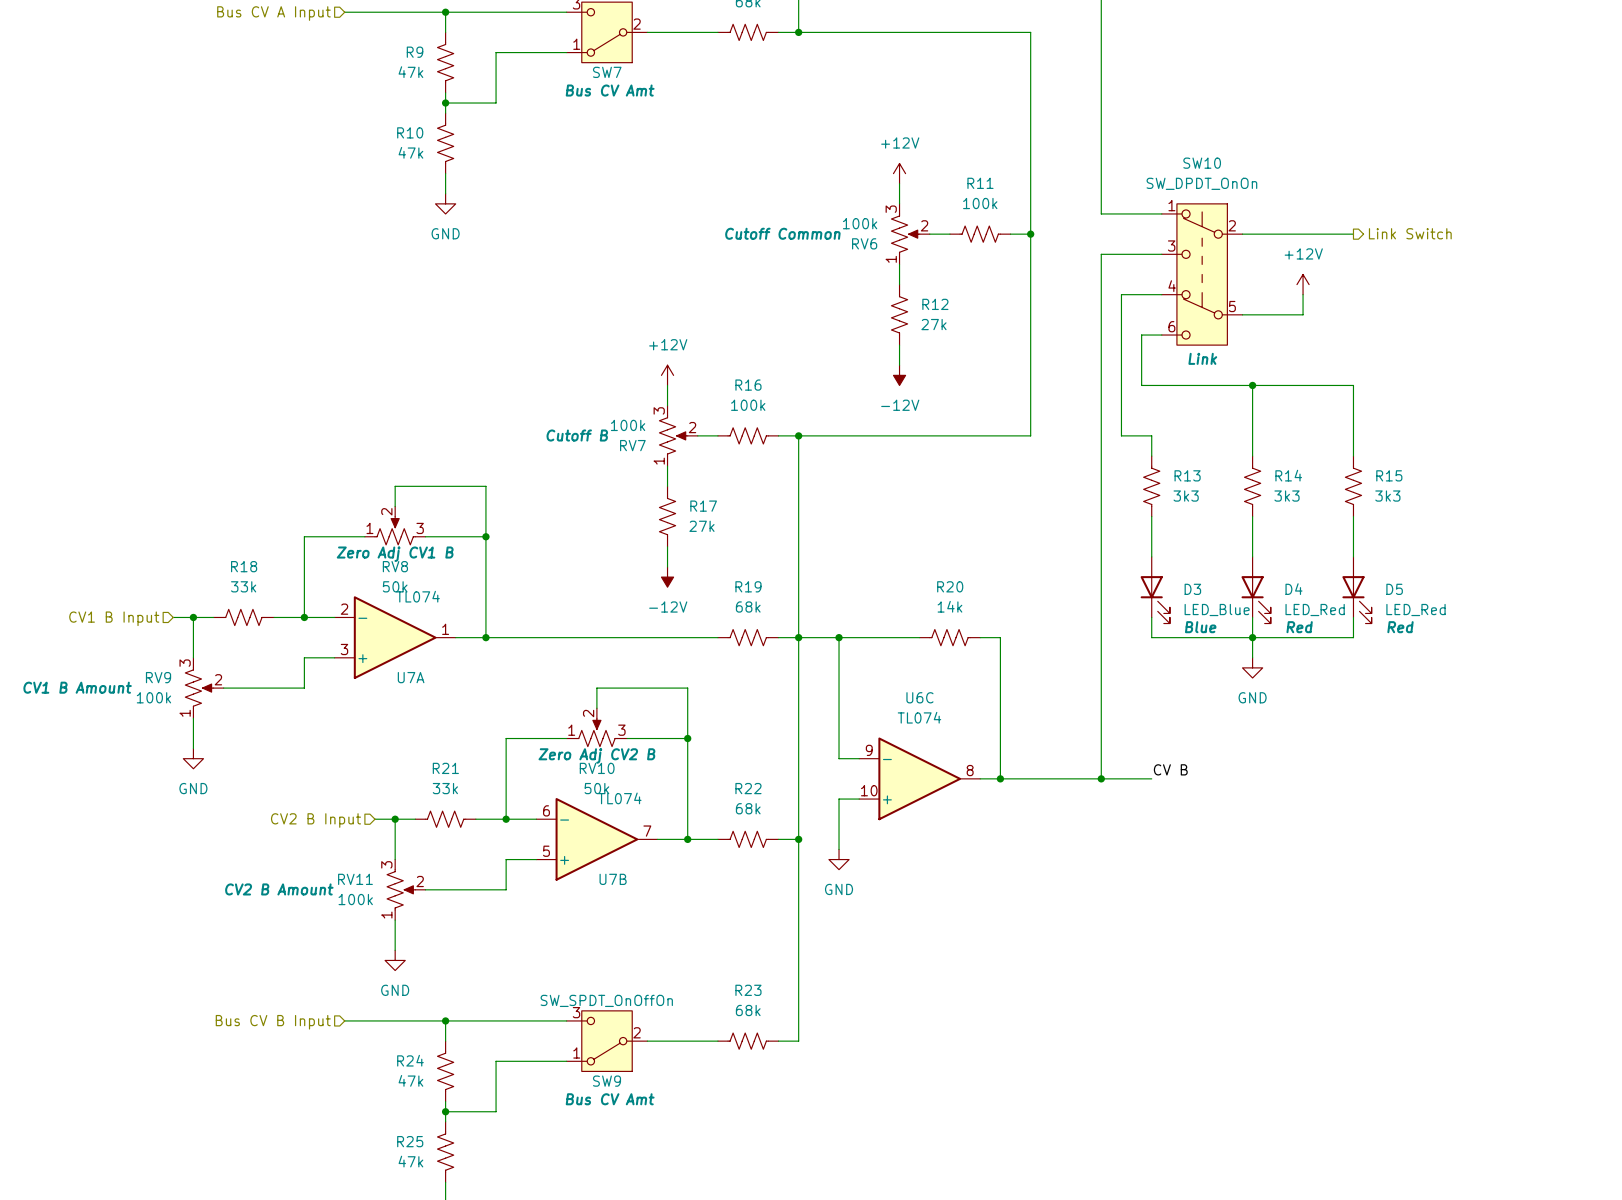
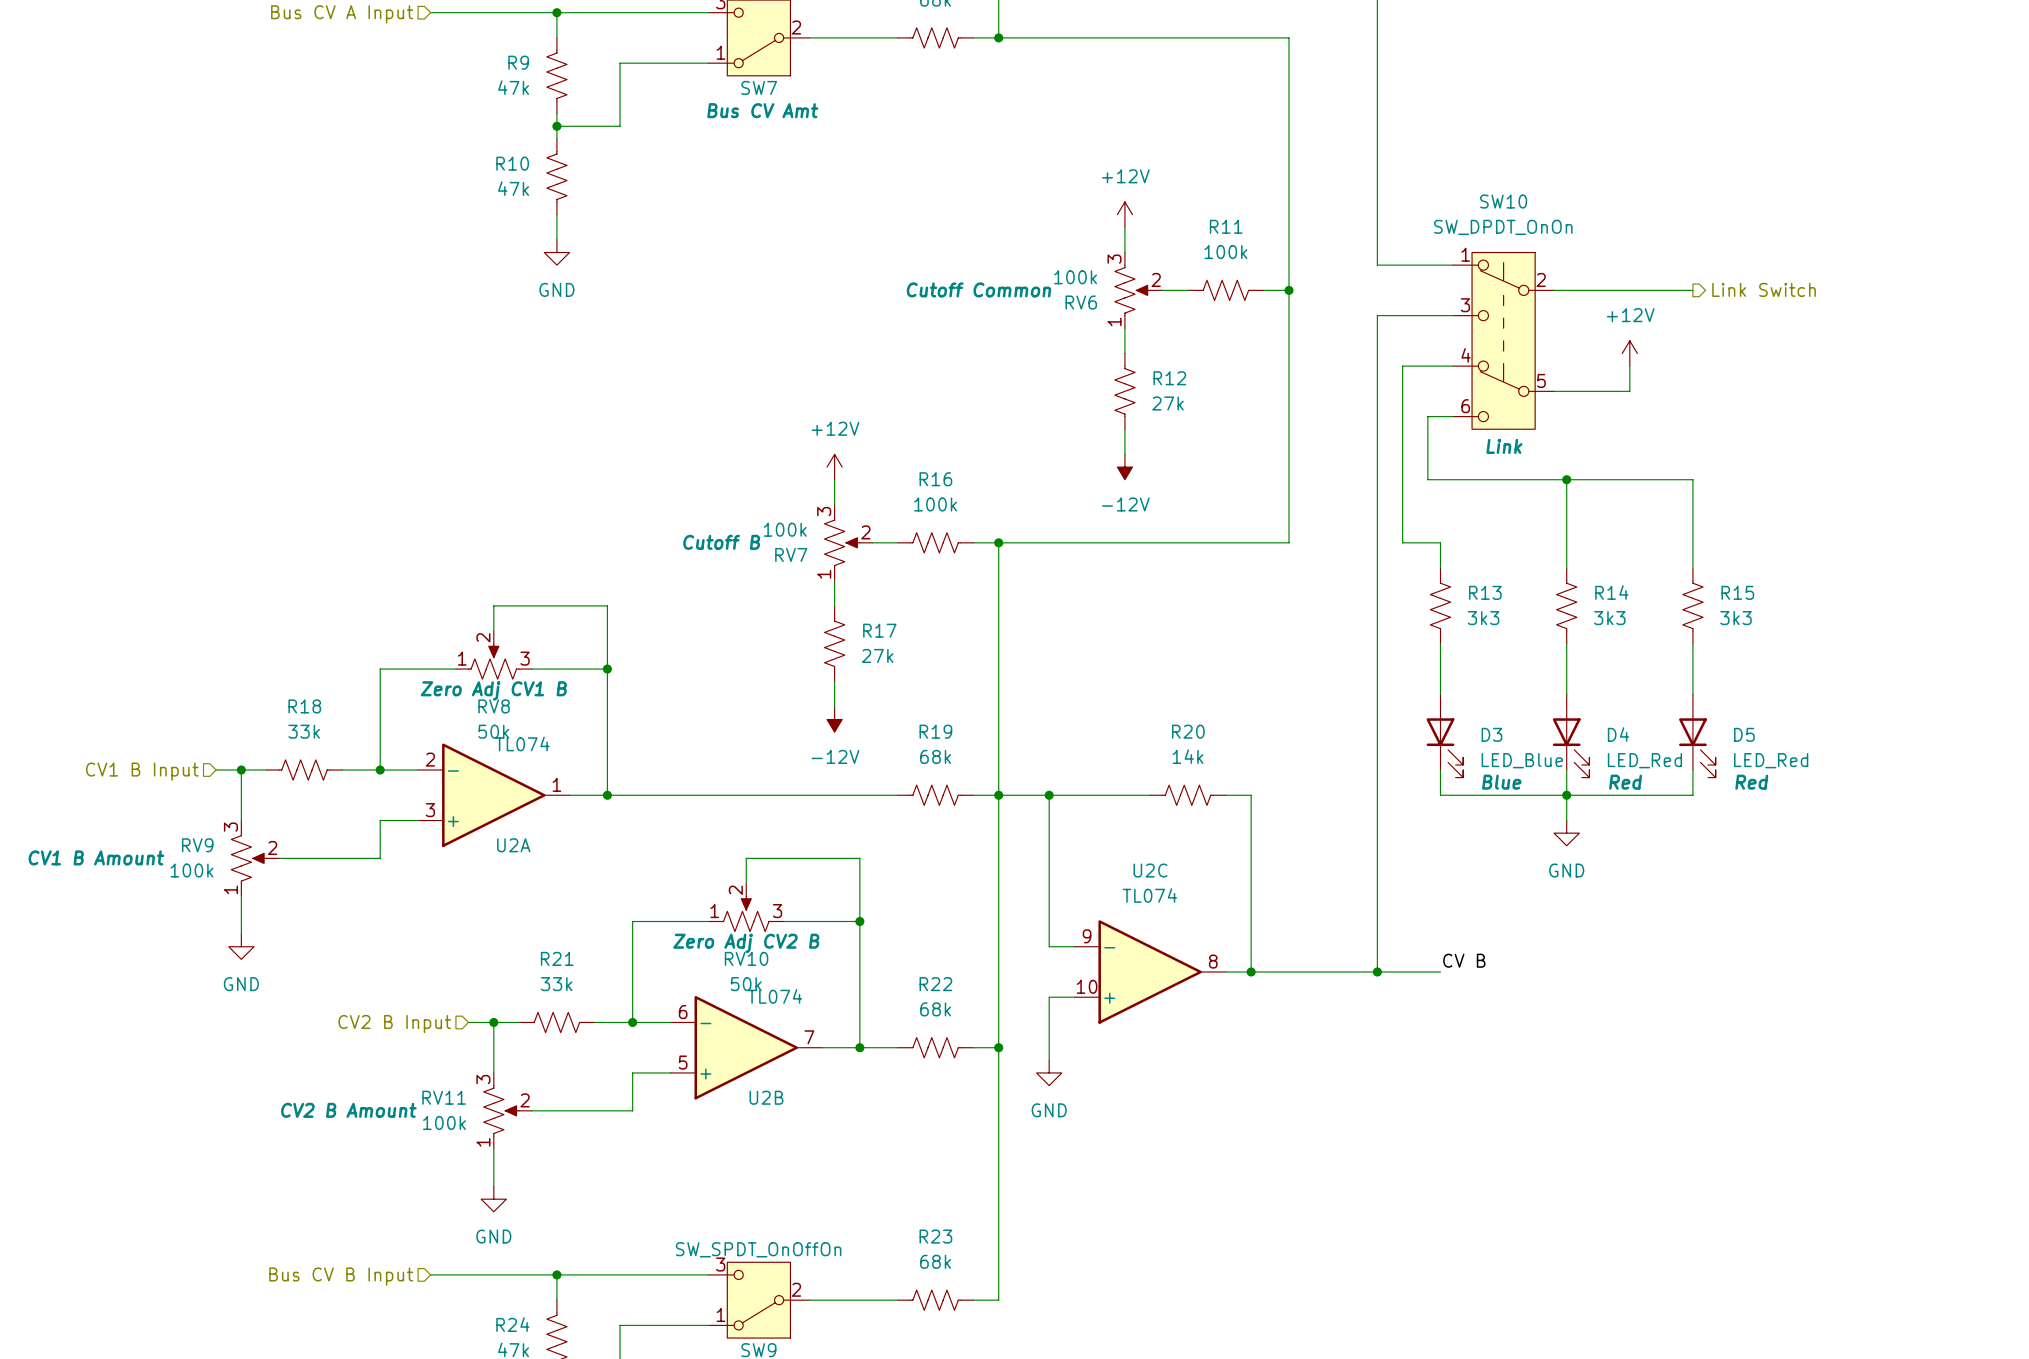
U7A name: U7A (411, 677) -> U2A (513, 845)
U6C name: U6C (919, 697) -> U2C (1150, 870)
U7B name: U7B (613, 879) -> U2B (766, 1097)

